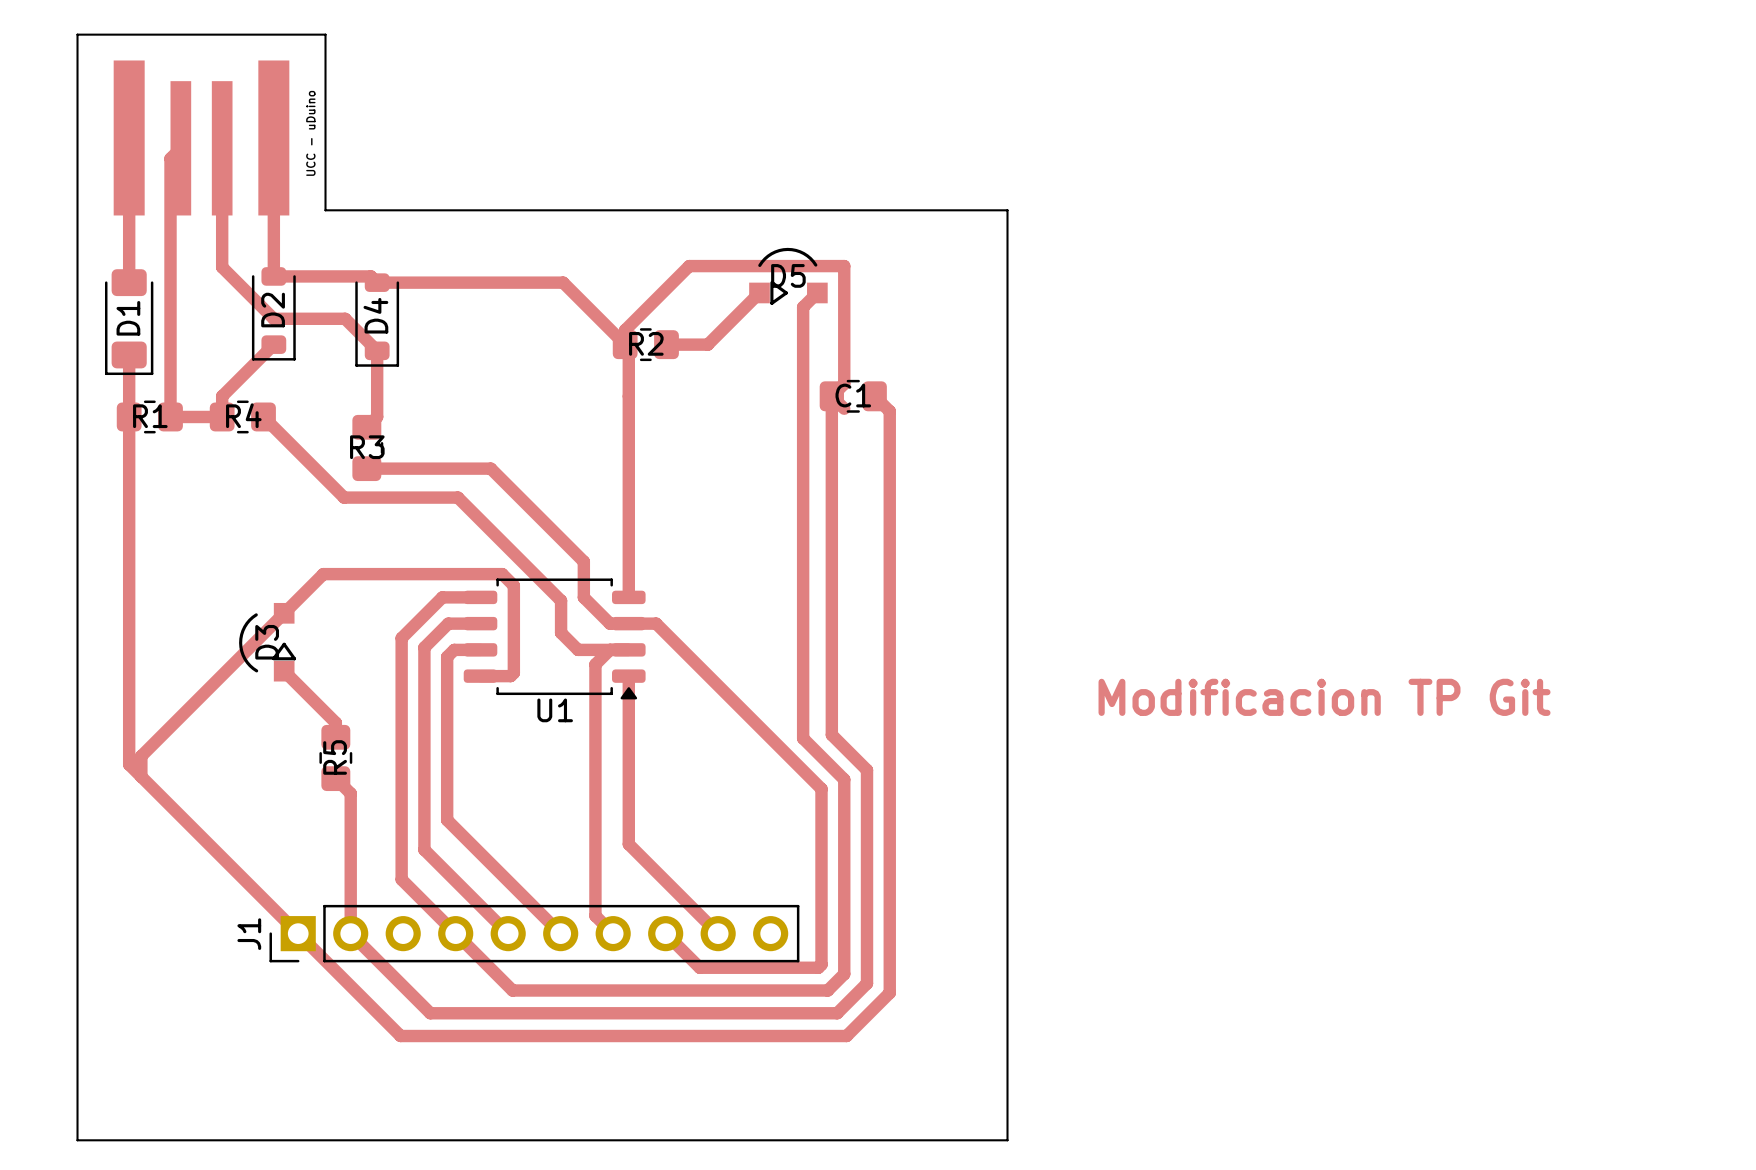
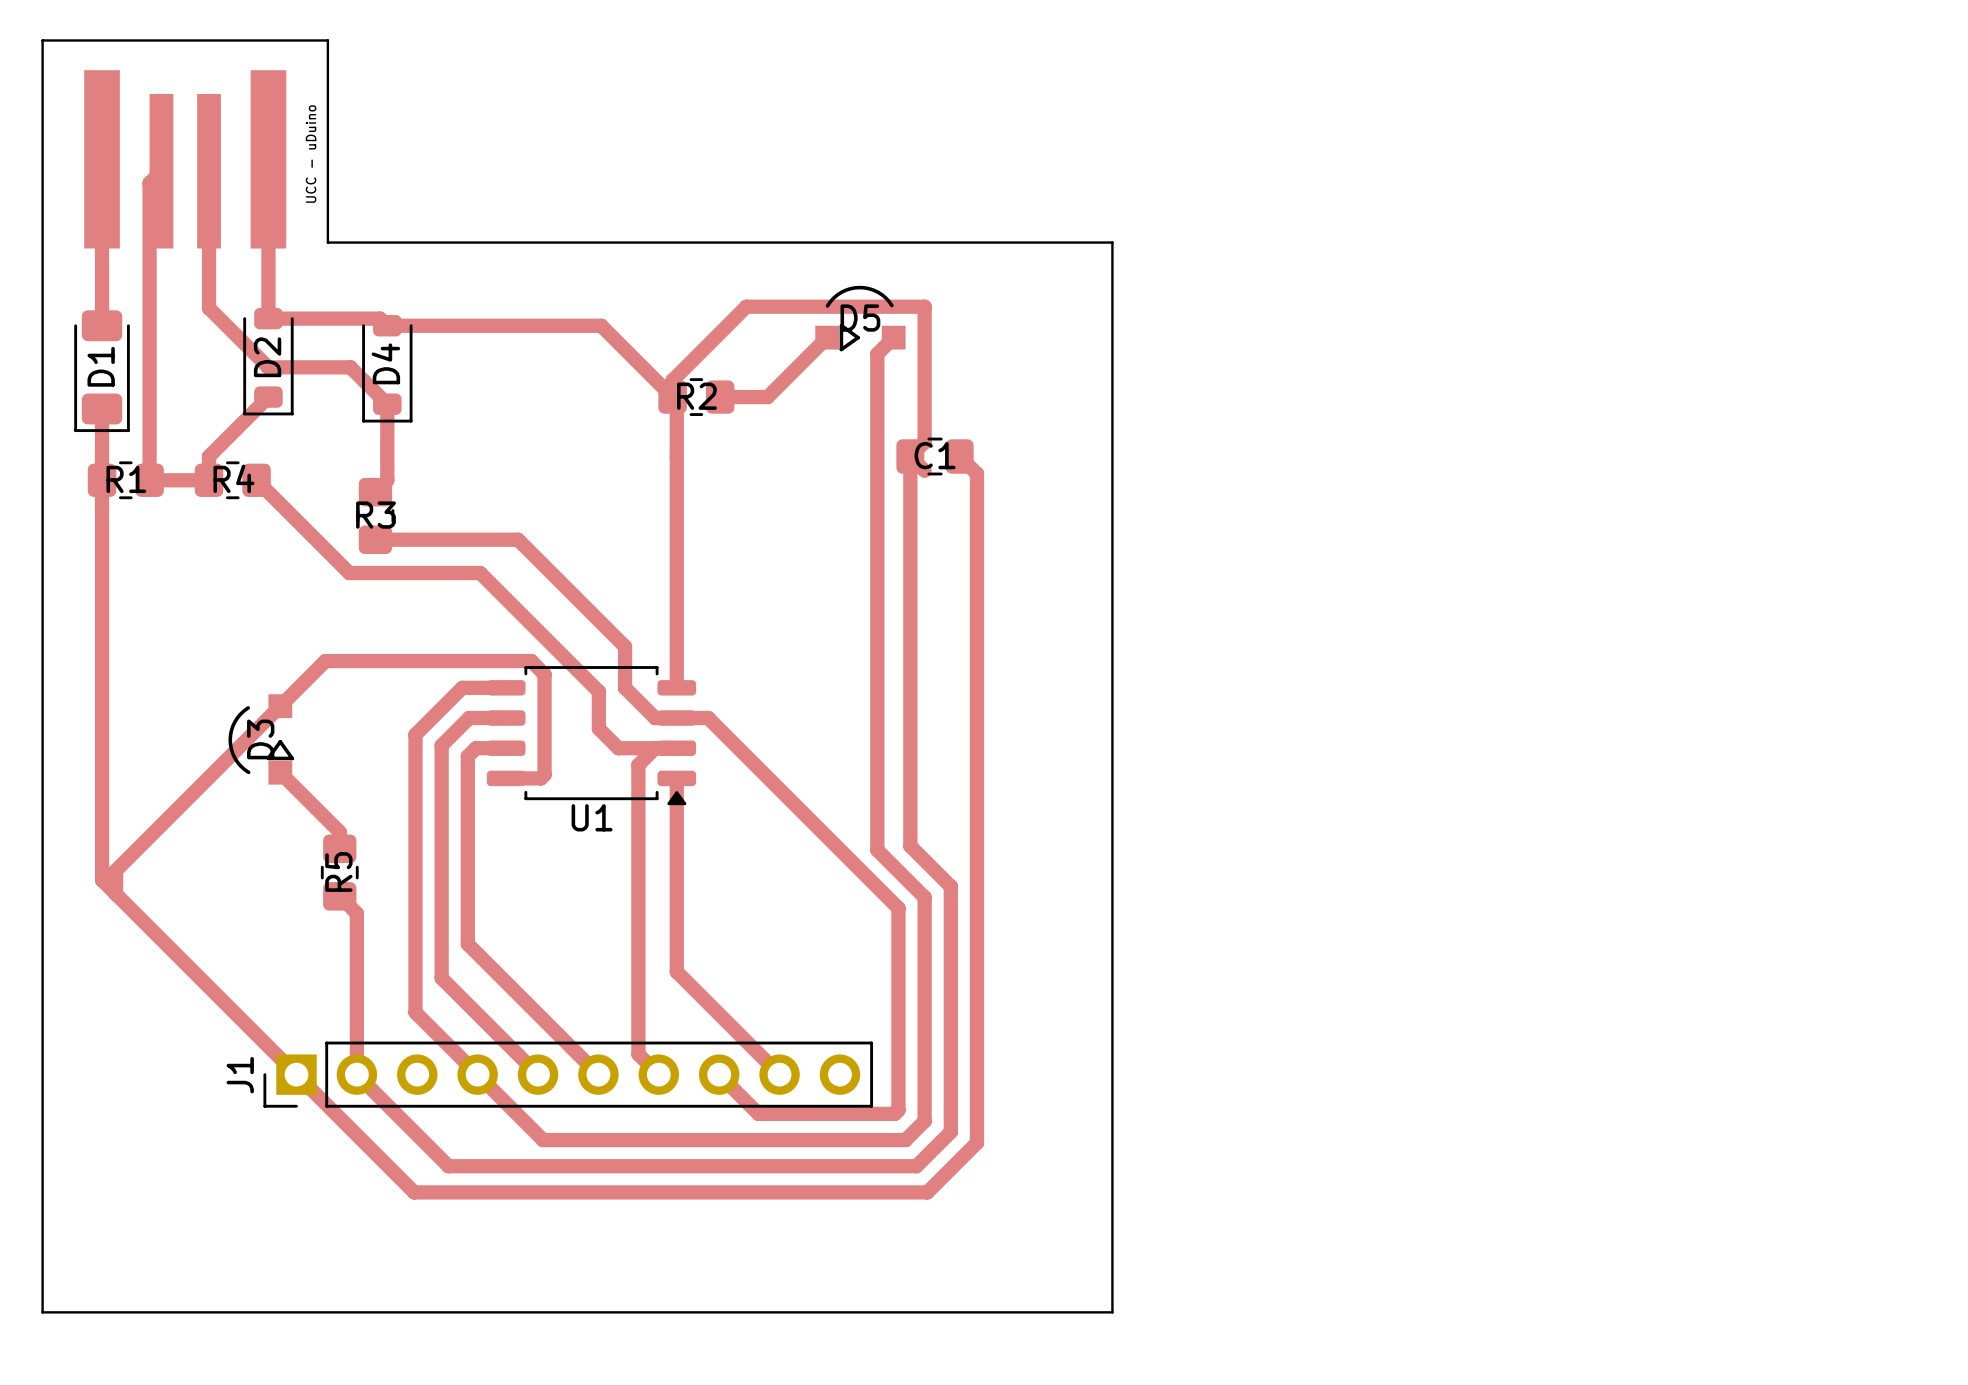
text: Modificacion TP Git (1324, 697) -> none

